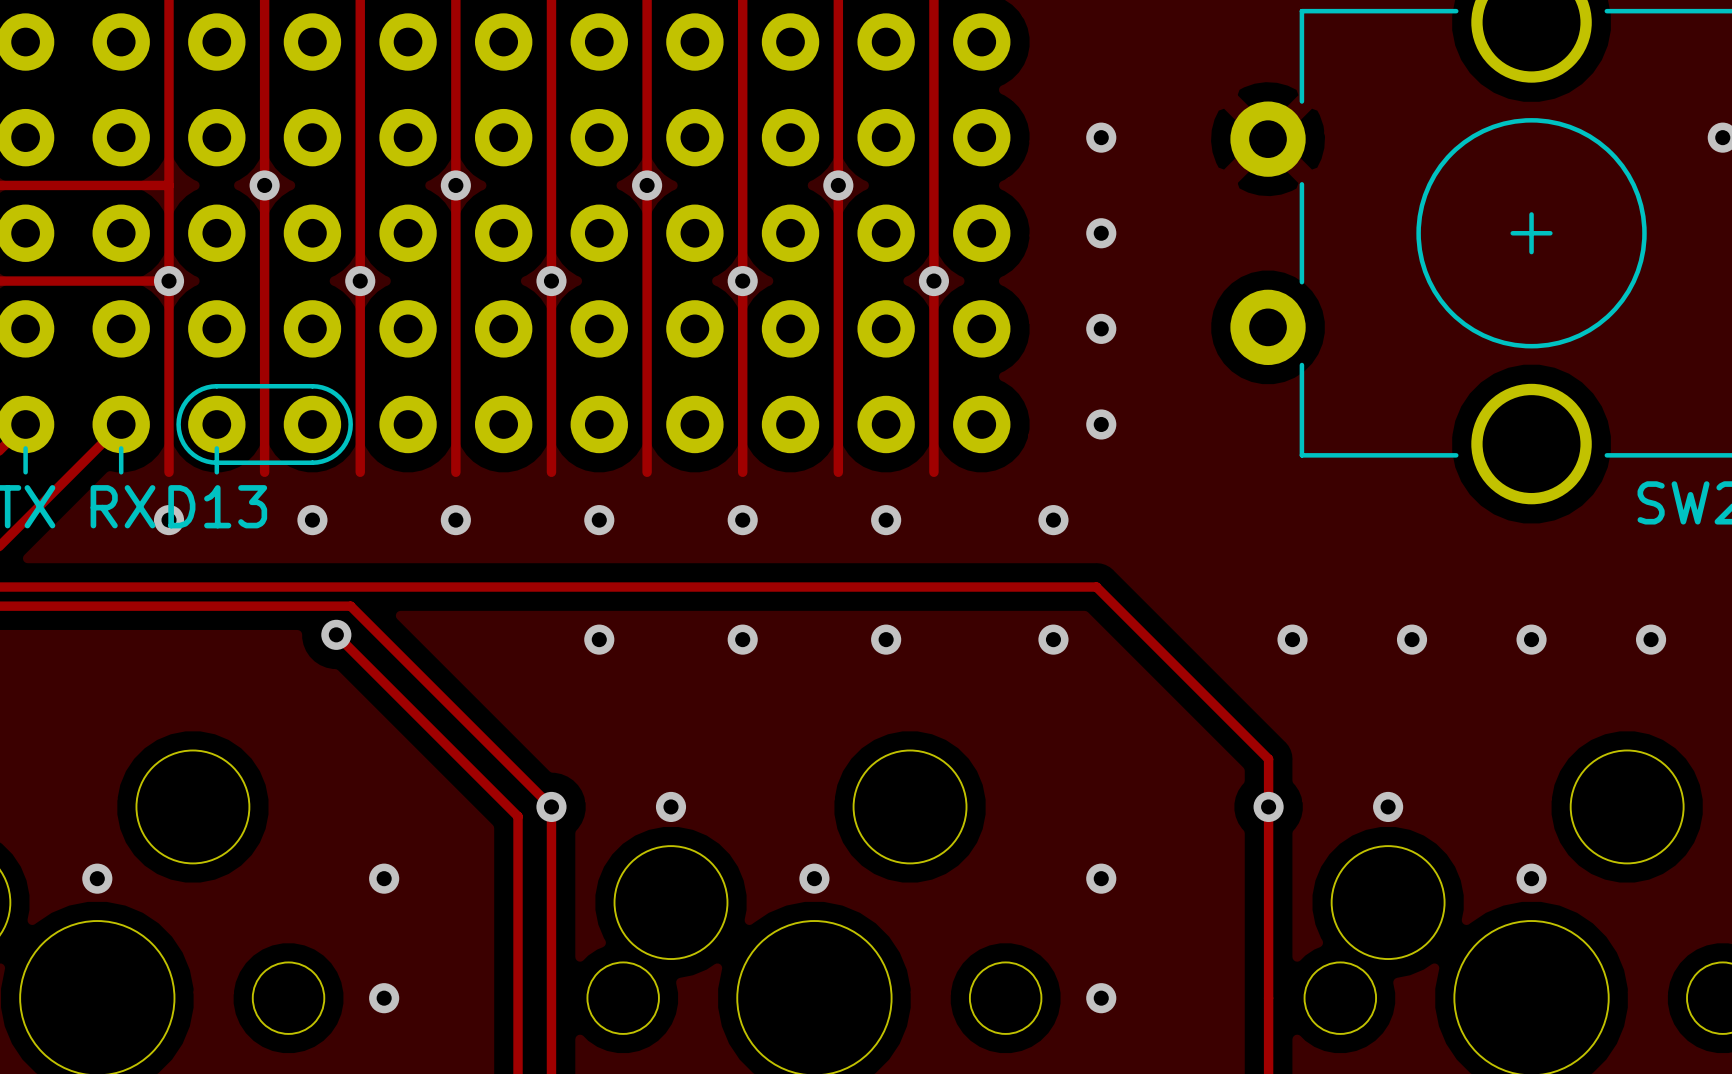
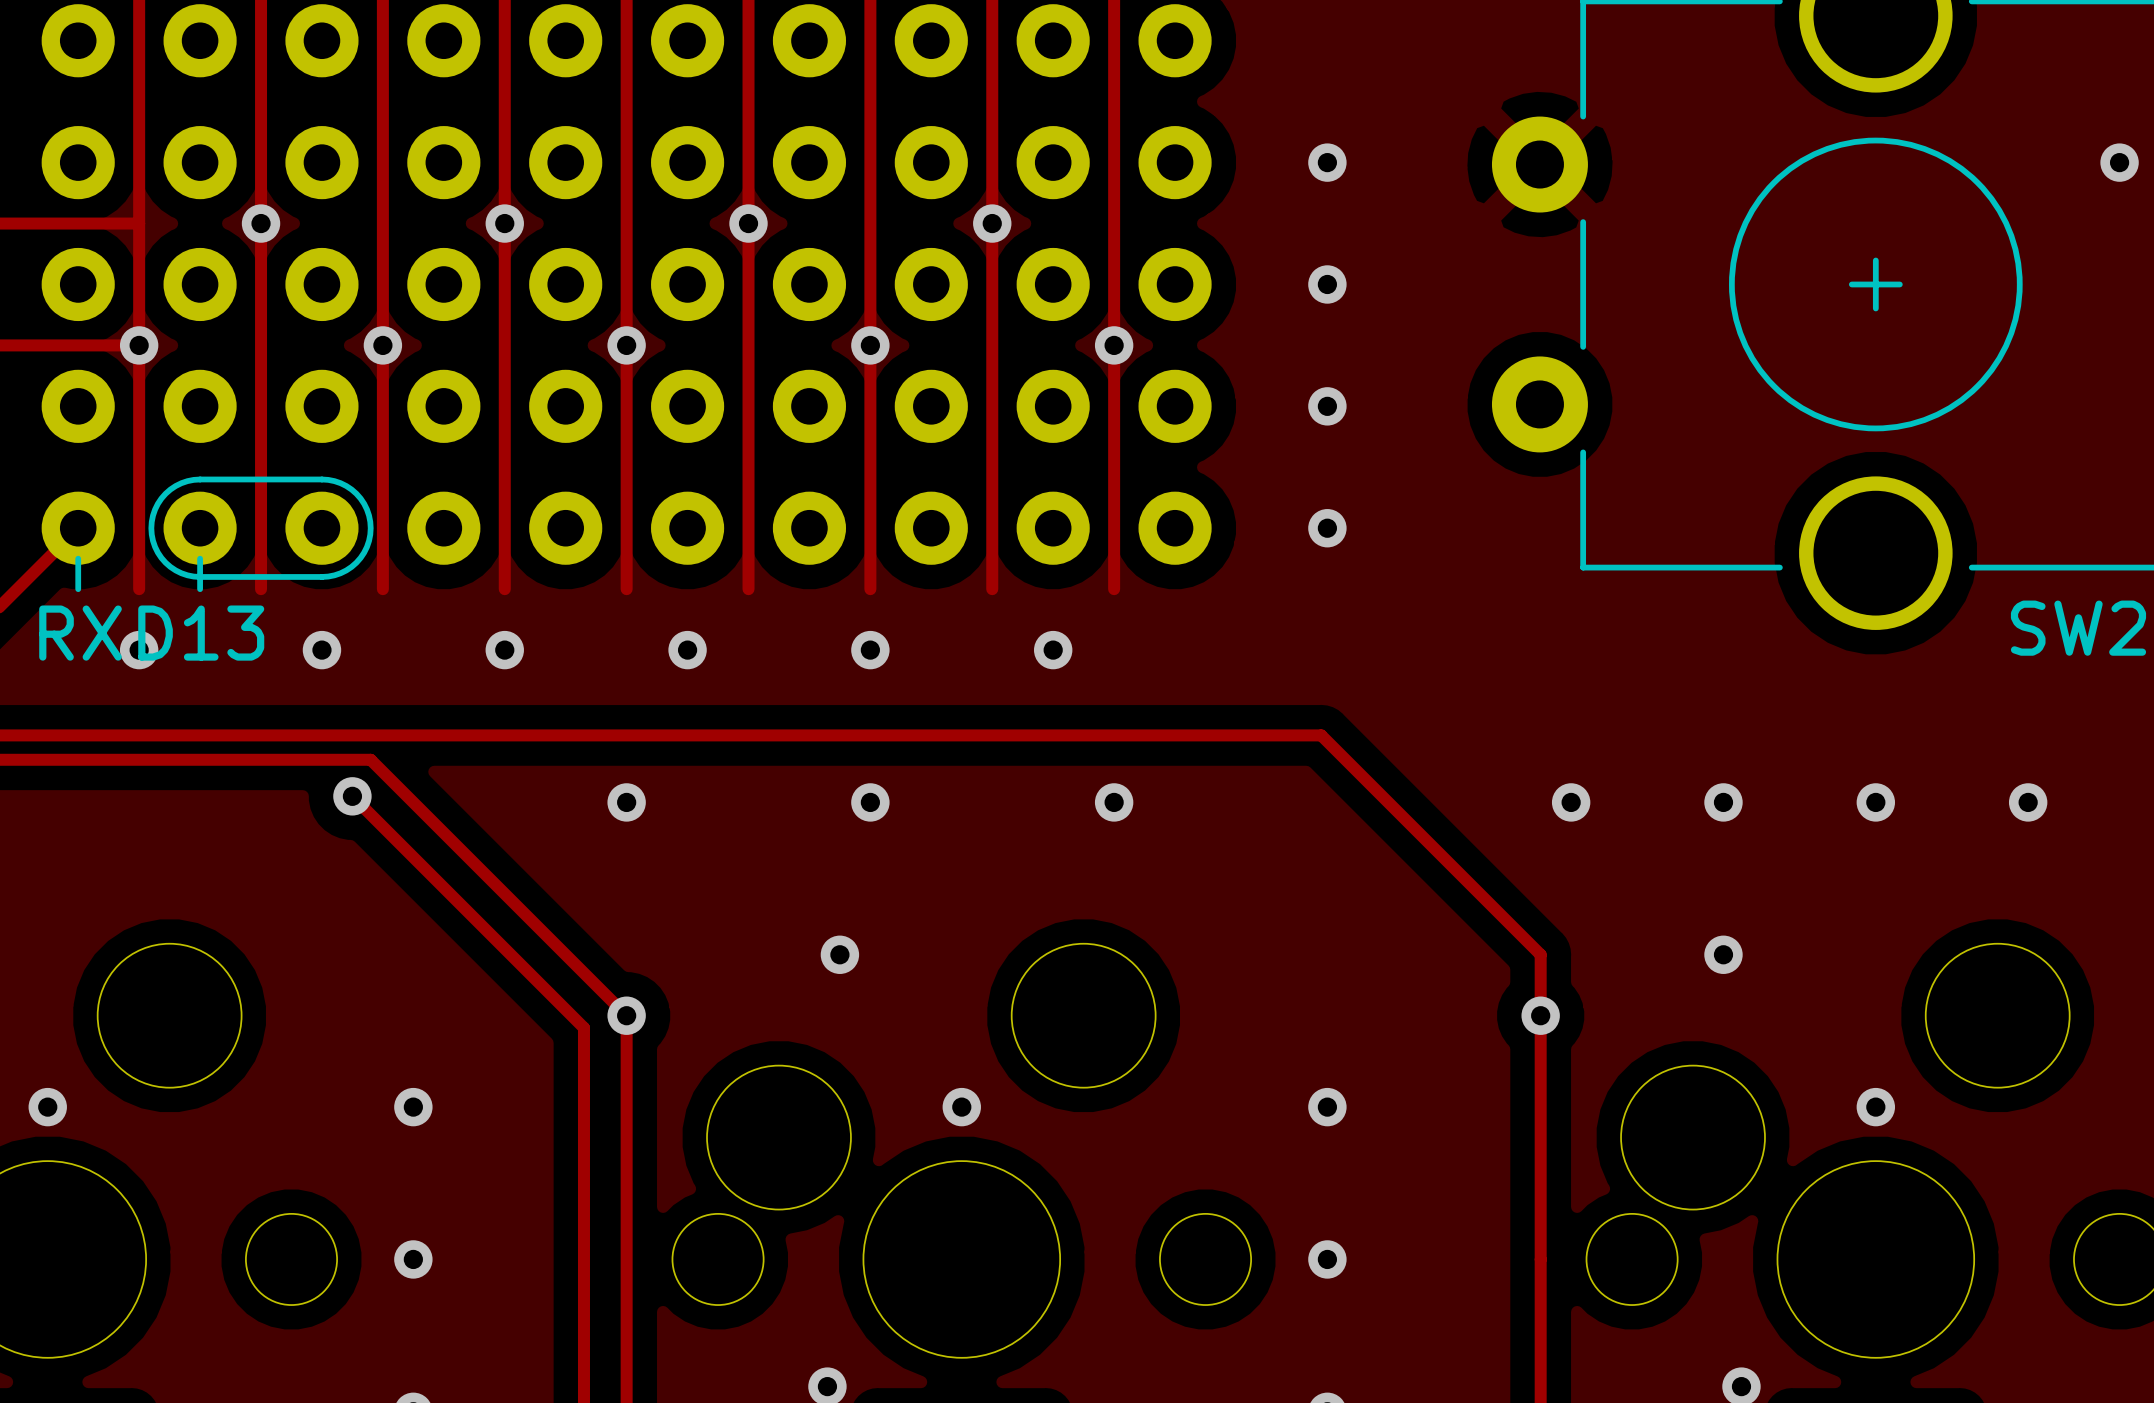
via: (1053, 520) -> none
via position: (599, 639) -> (626, 802)
via position: (886, 639) -> (1114, 802)
via: (1053, 639) -> none
via position: (671, 806) -> (839, 954)
via position: (1388, 806) -> (1723, 954)

